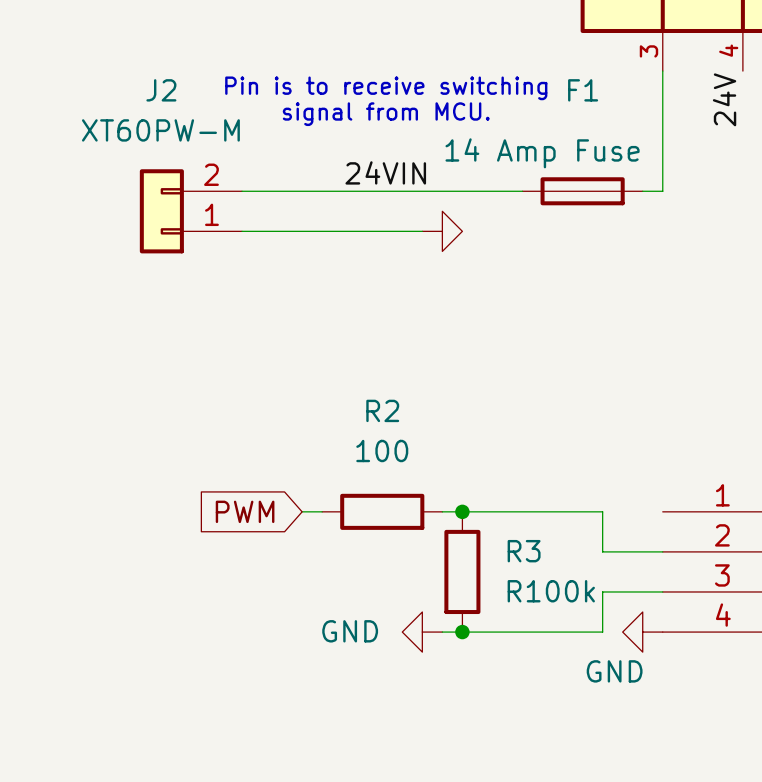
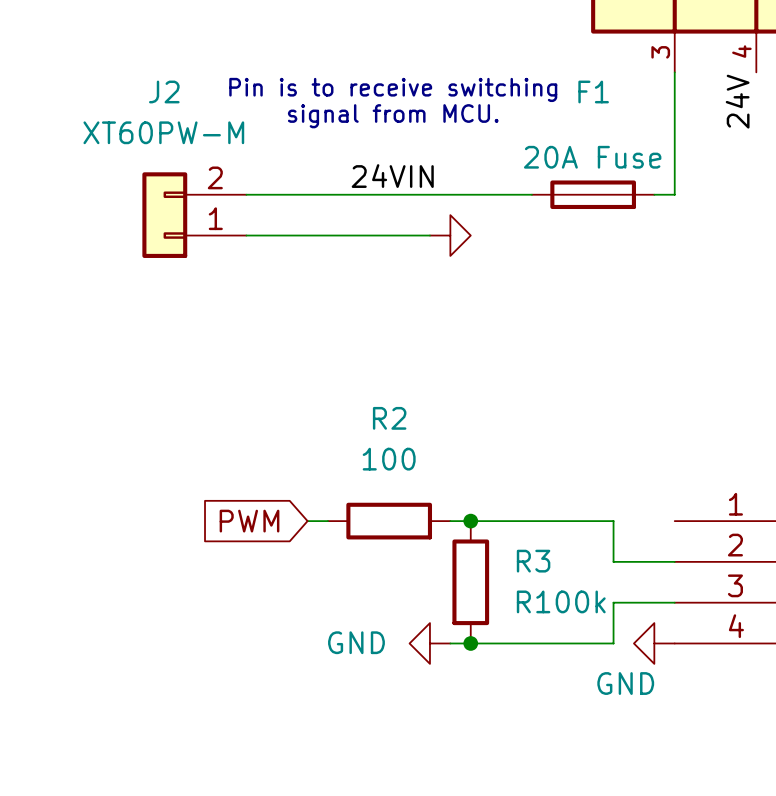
F1 value: 14 Amp Fuse (542, 153) -> 20A Fuse (592, 157)

